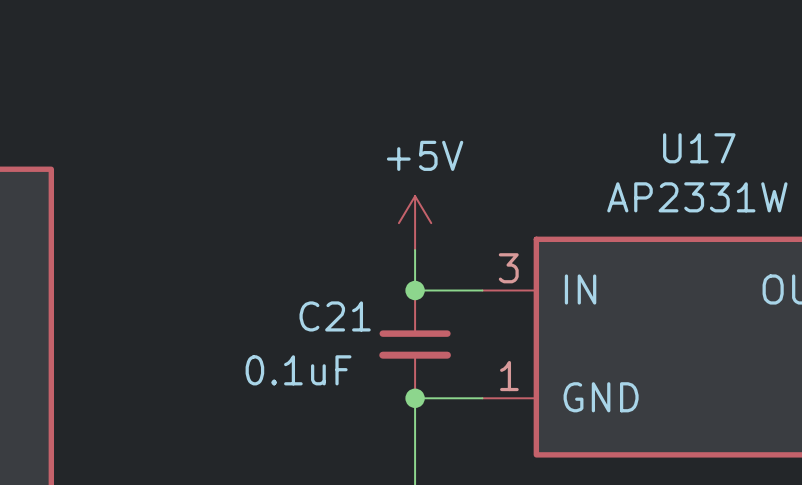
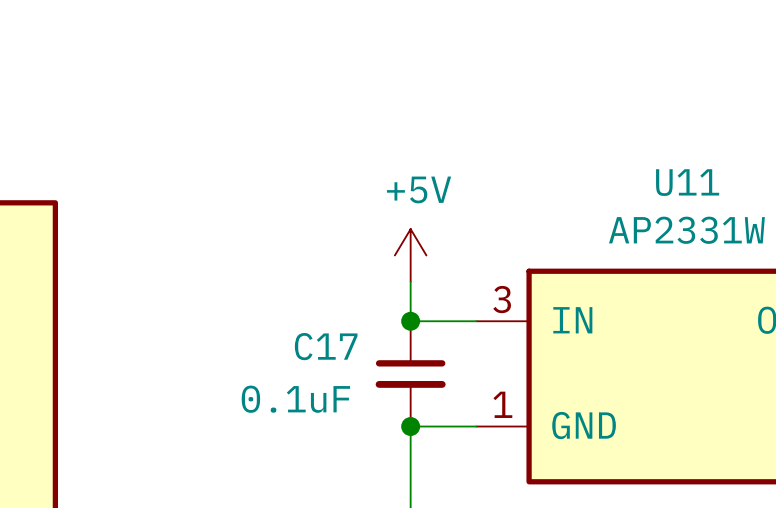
U17 name: U17 (699, 148) -> U11 (687, 182)
C21 name: C21 (335, 316) -> C17 (326, 346)

